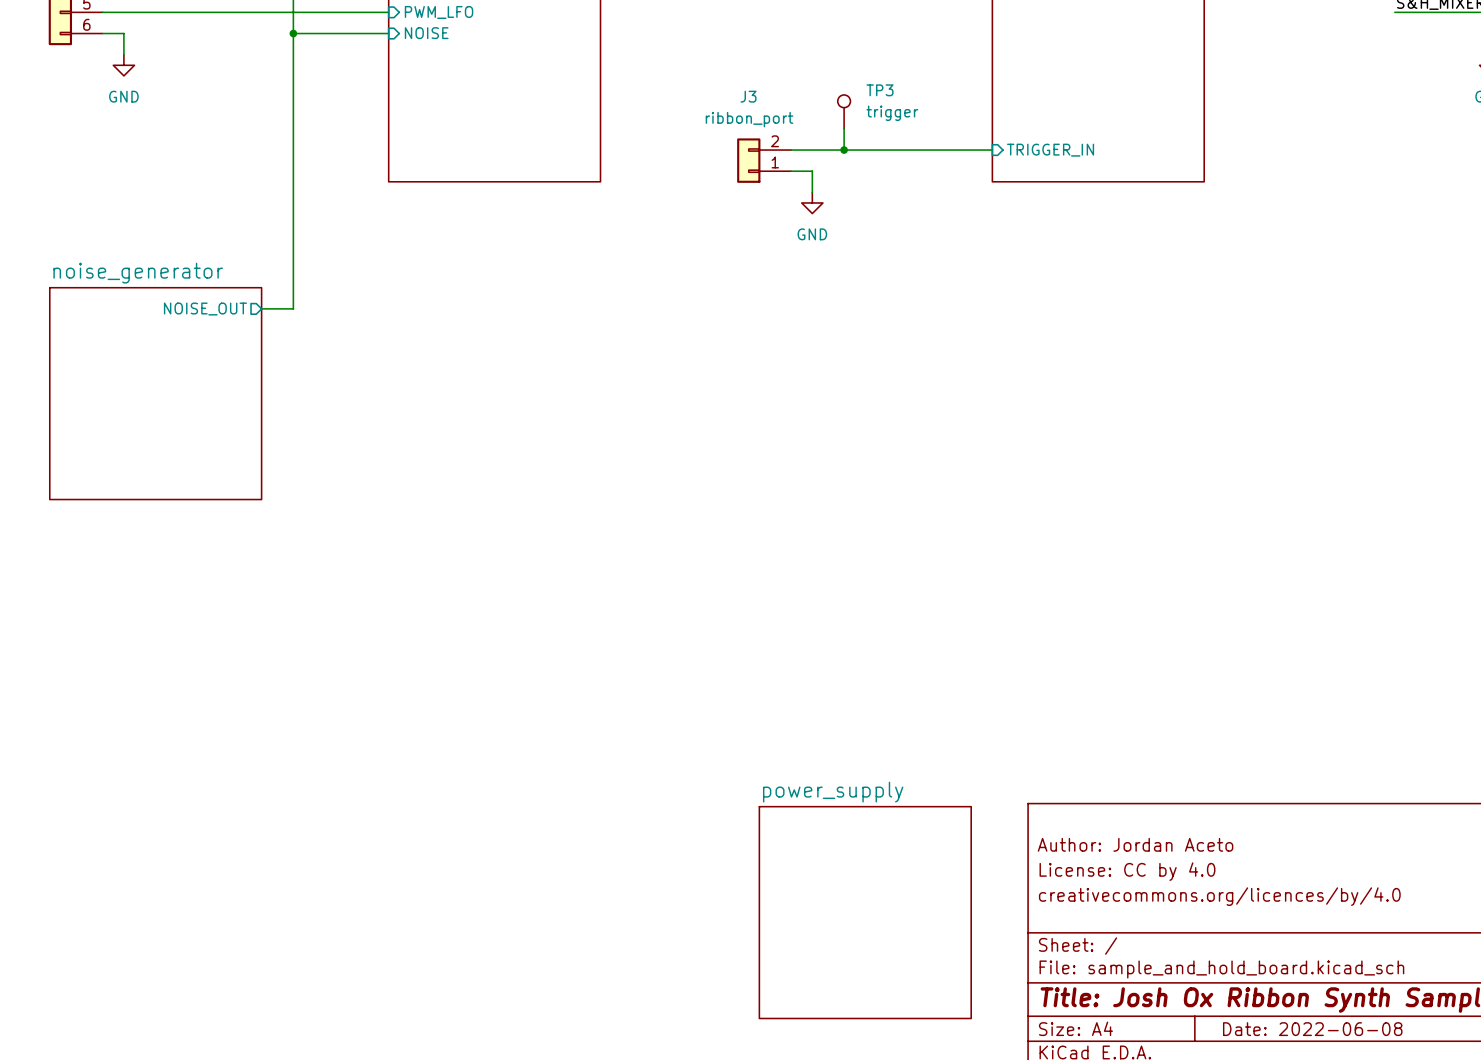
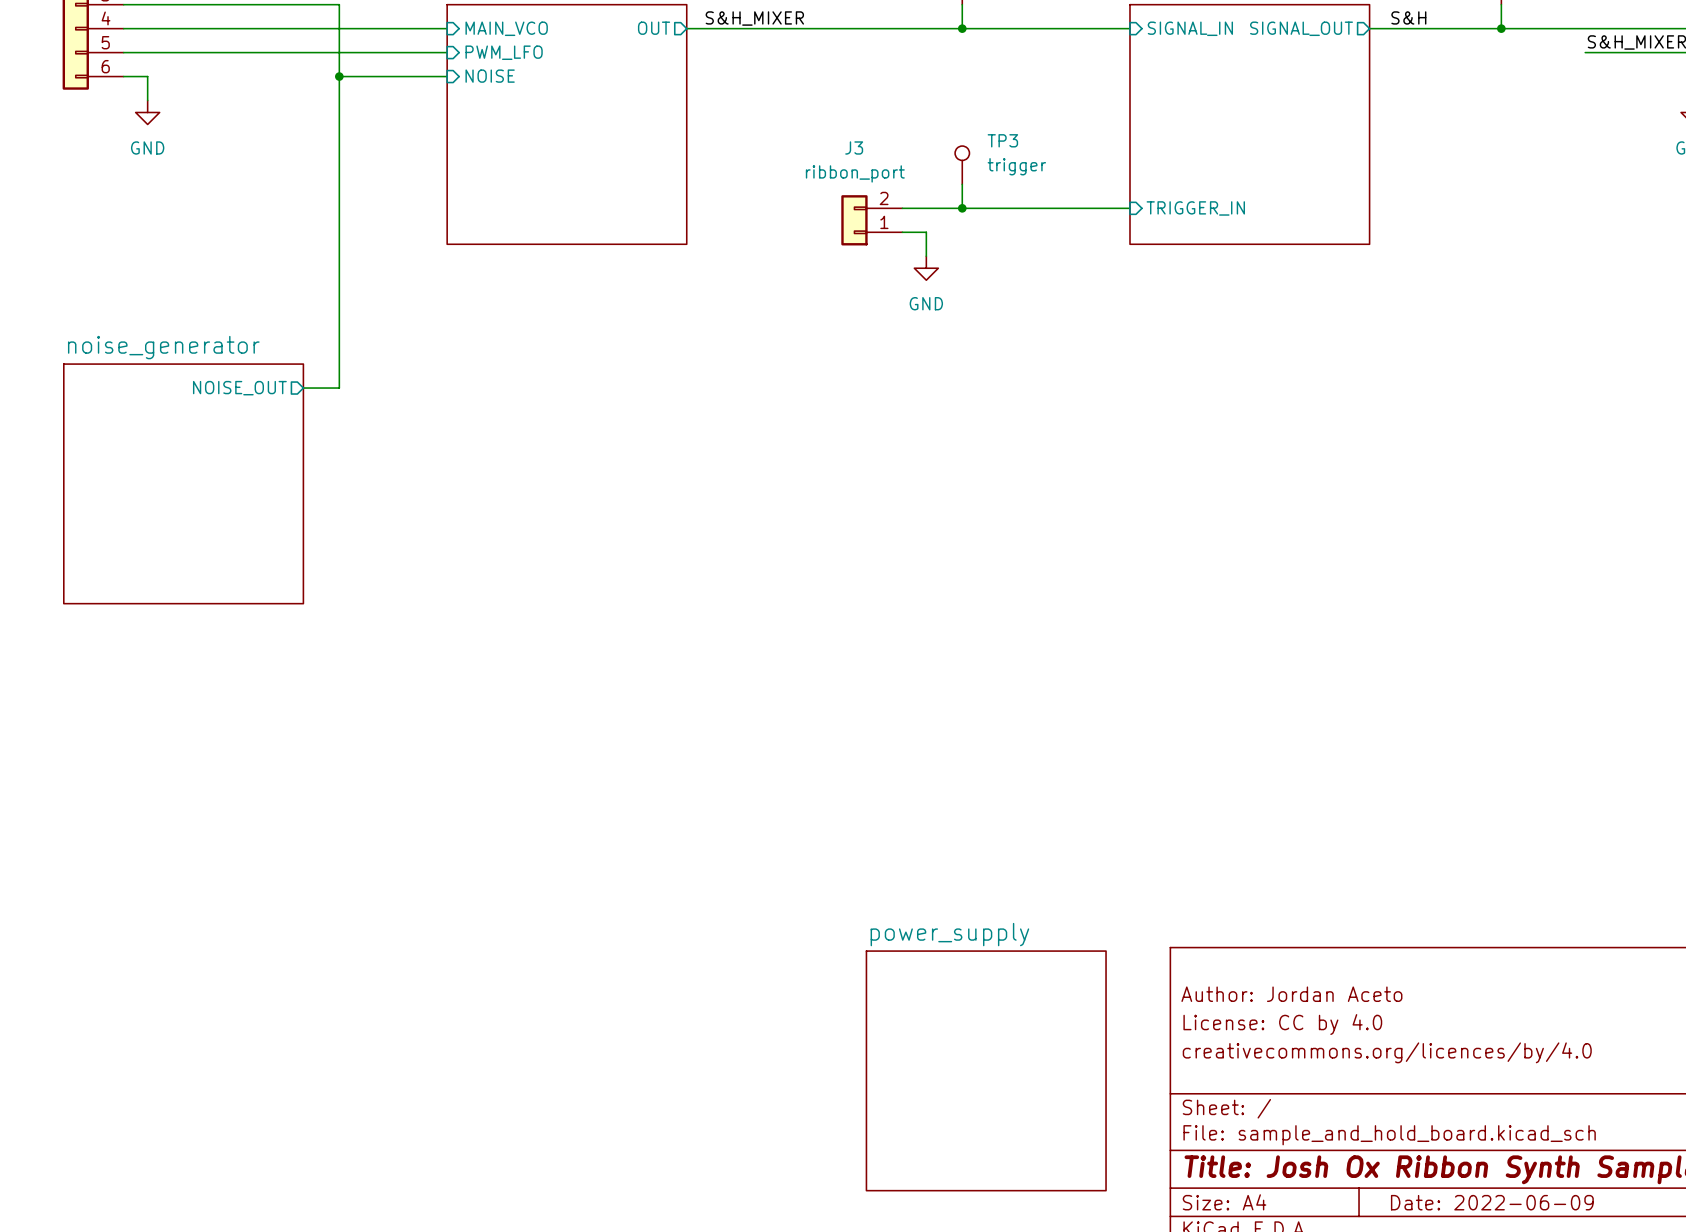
title block: Date: 2022-06-08 (1312, 1029) -> Date: 2022-06-09 (1492, 1202)

